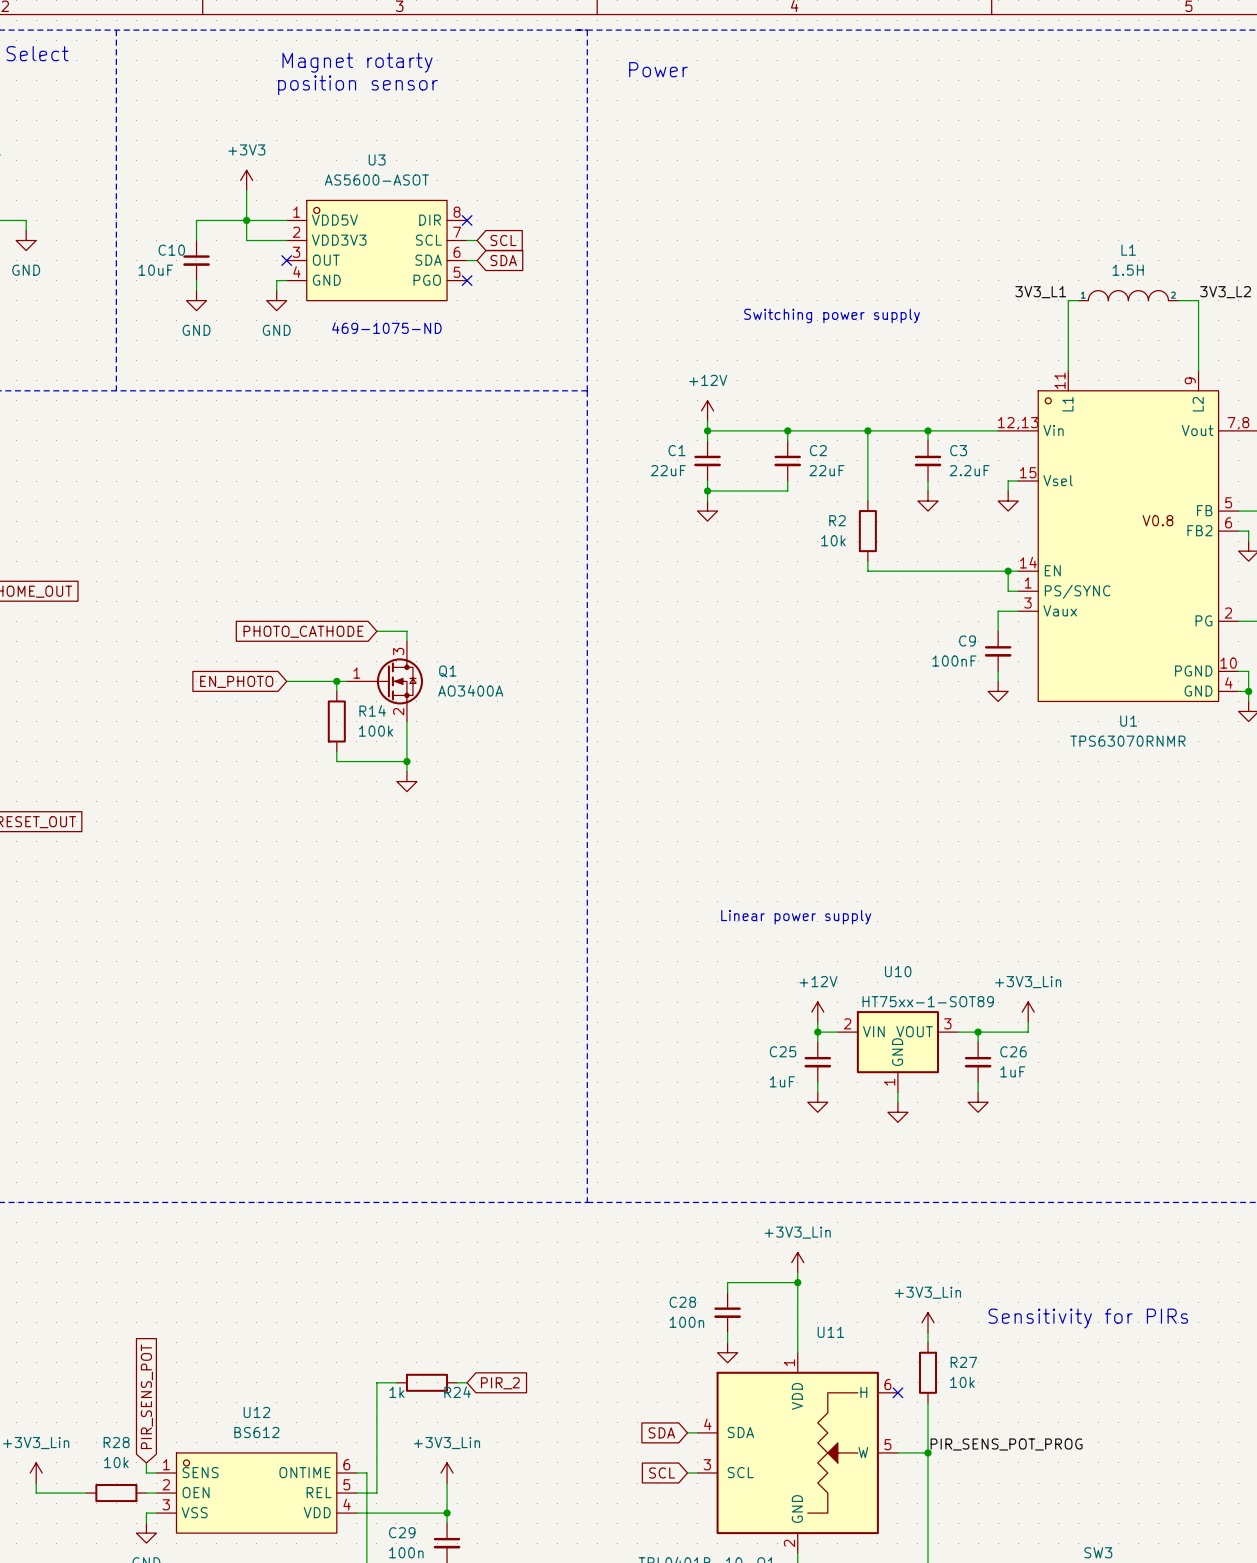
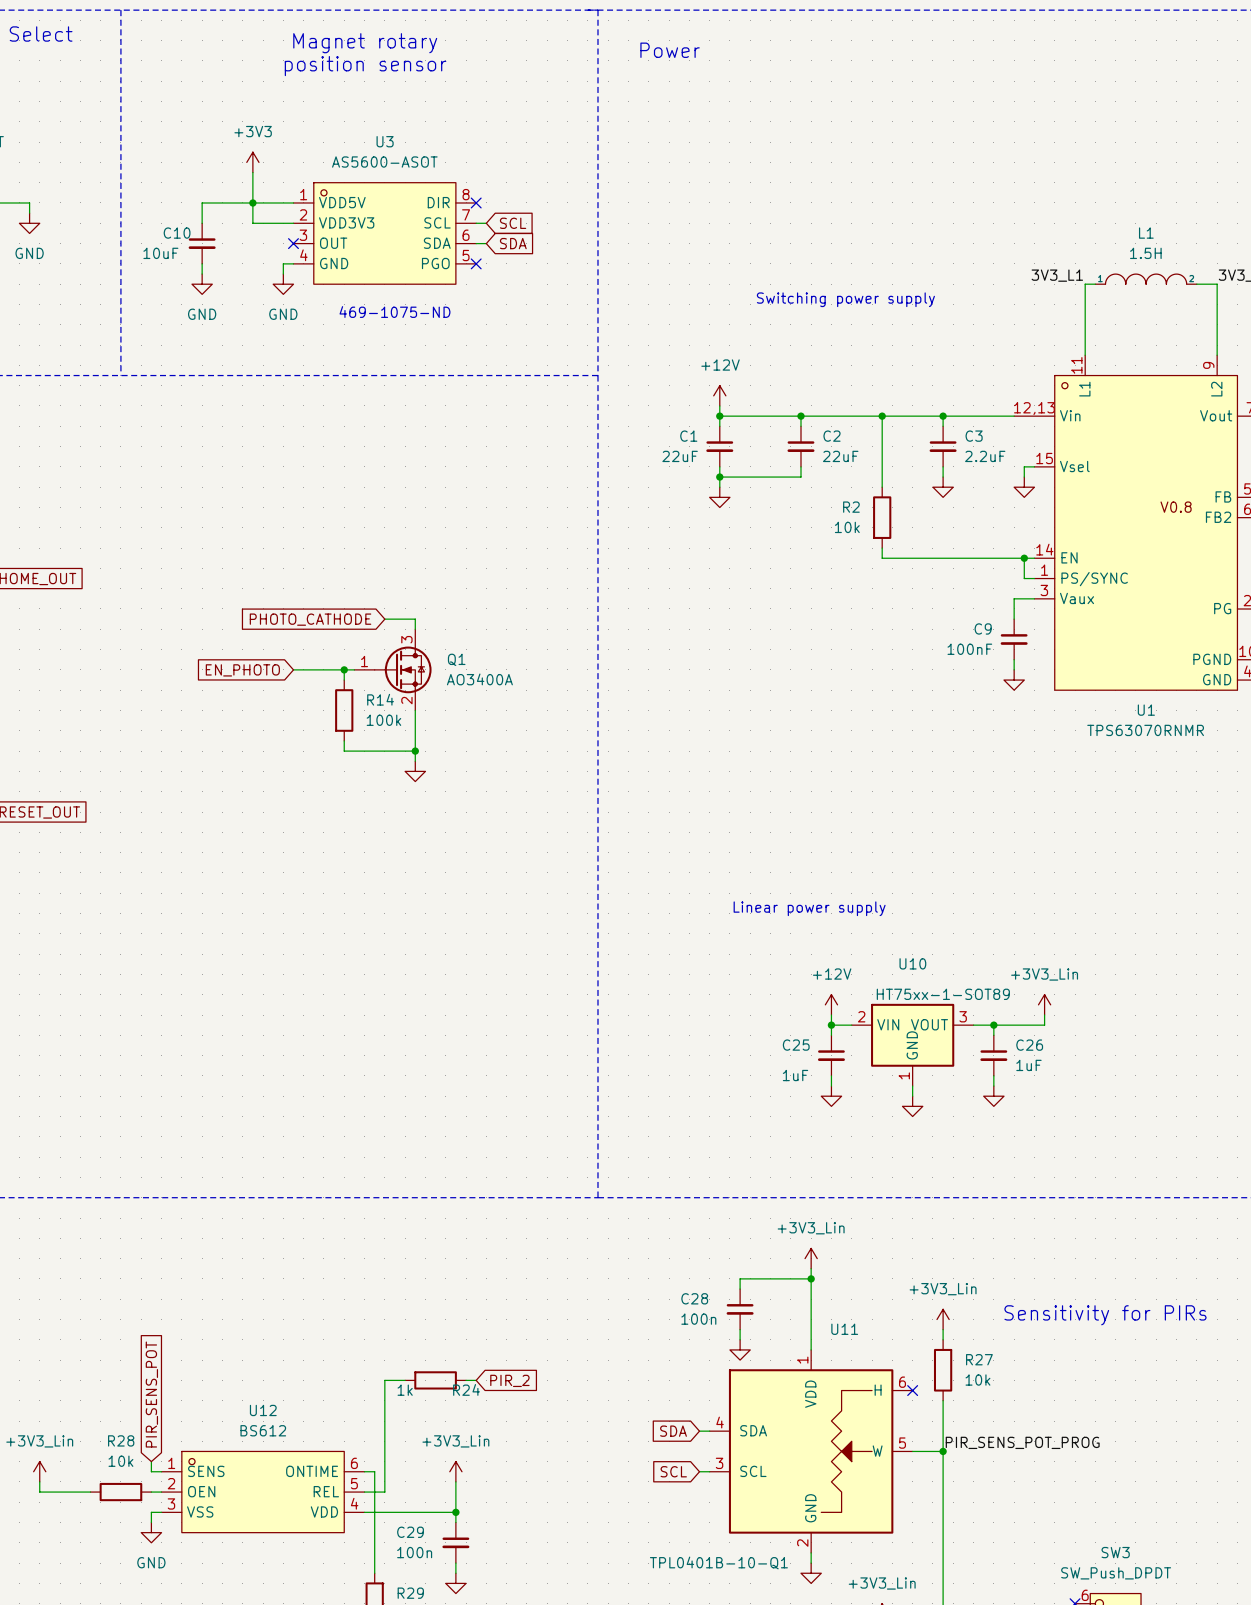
text: Magnet rotarty (357, 62) -> Magnet rotary (365, 43)

